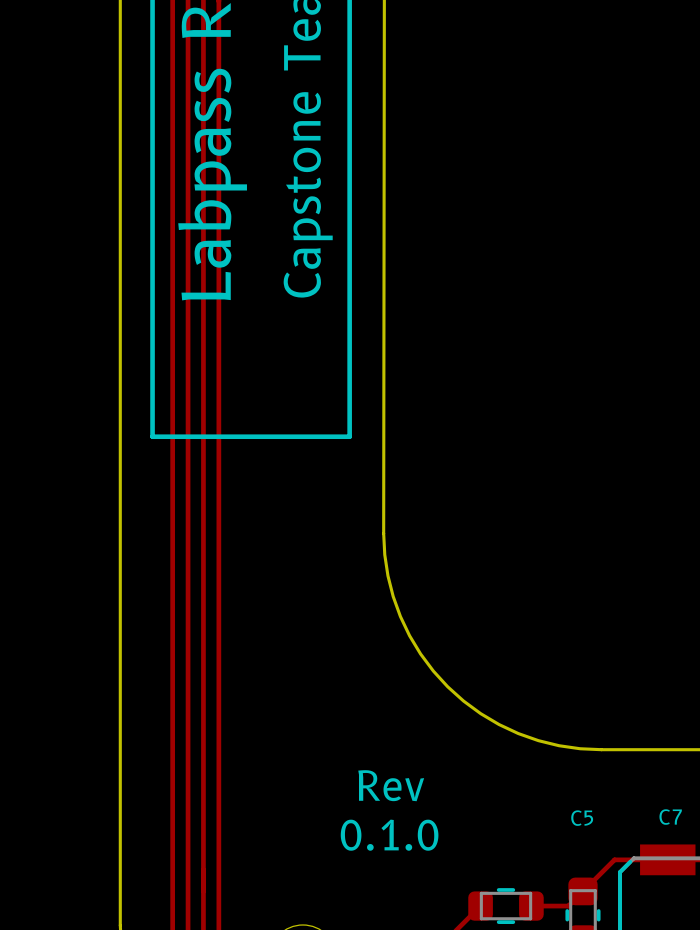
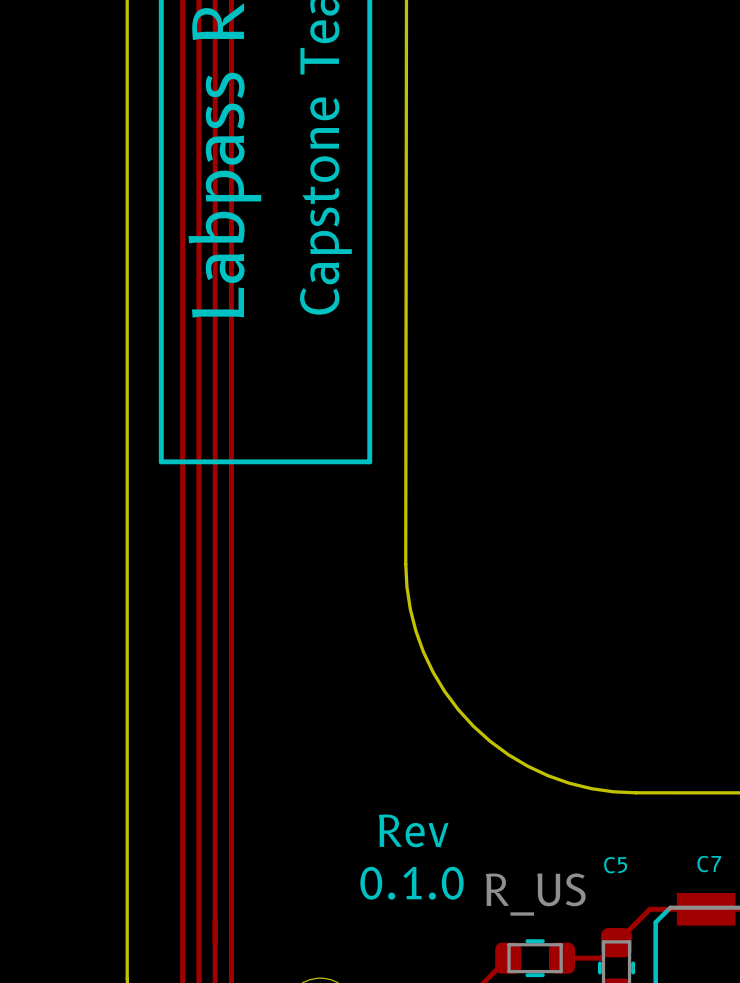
part value: none -> R_US (535, 894)

